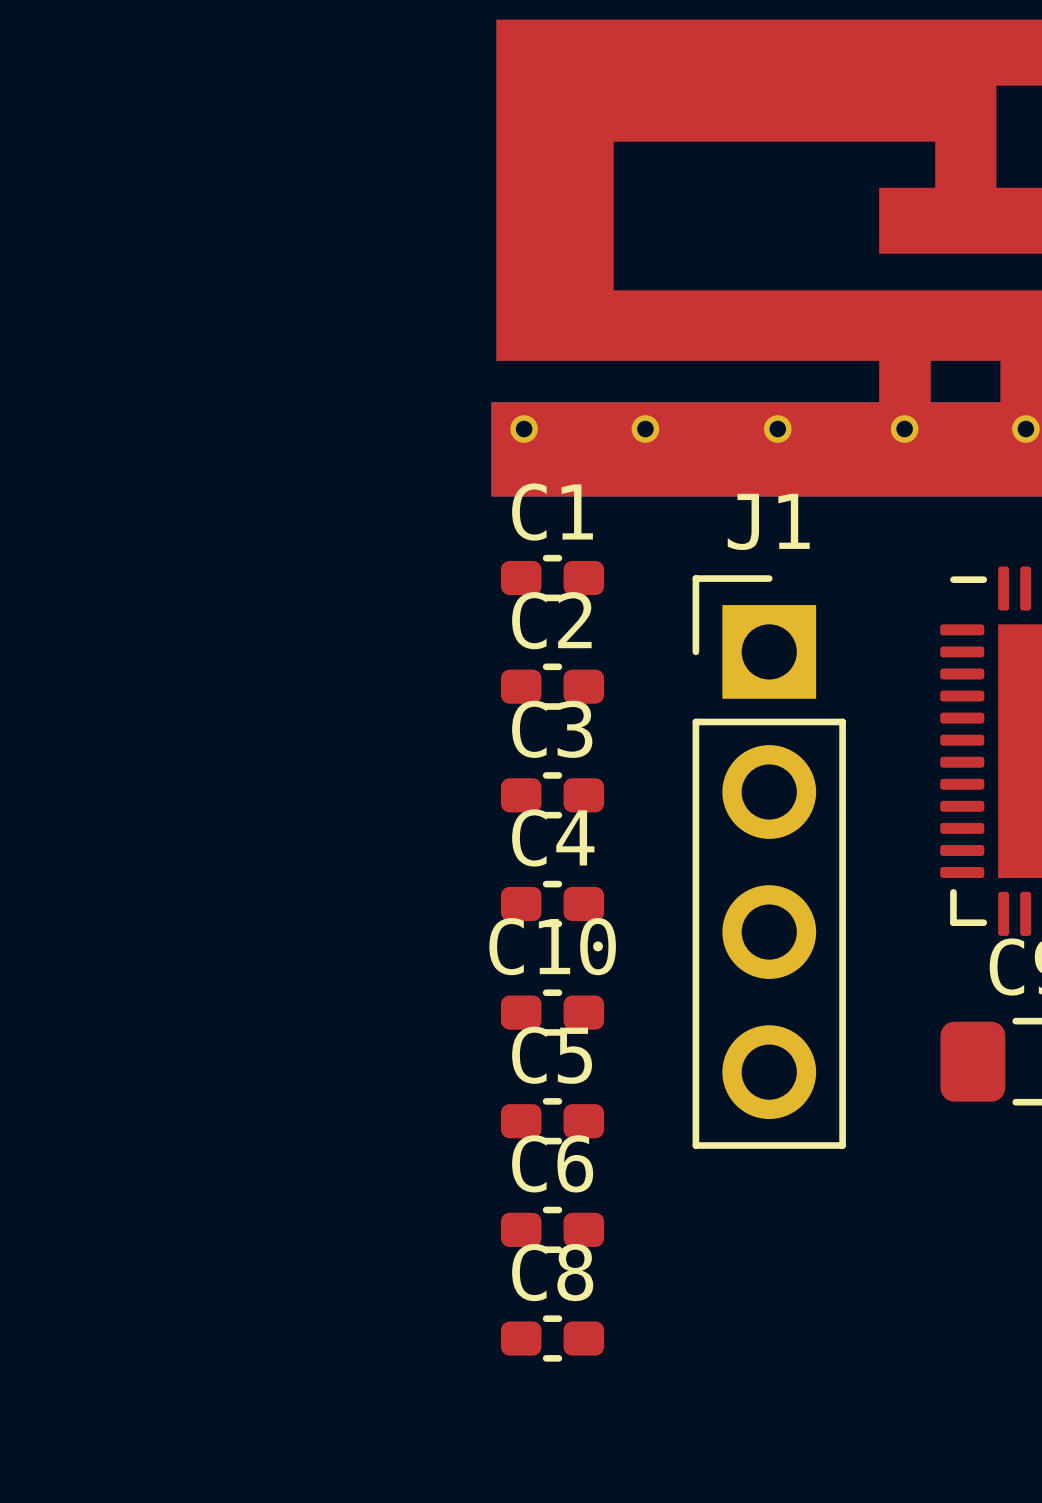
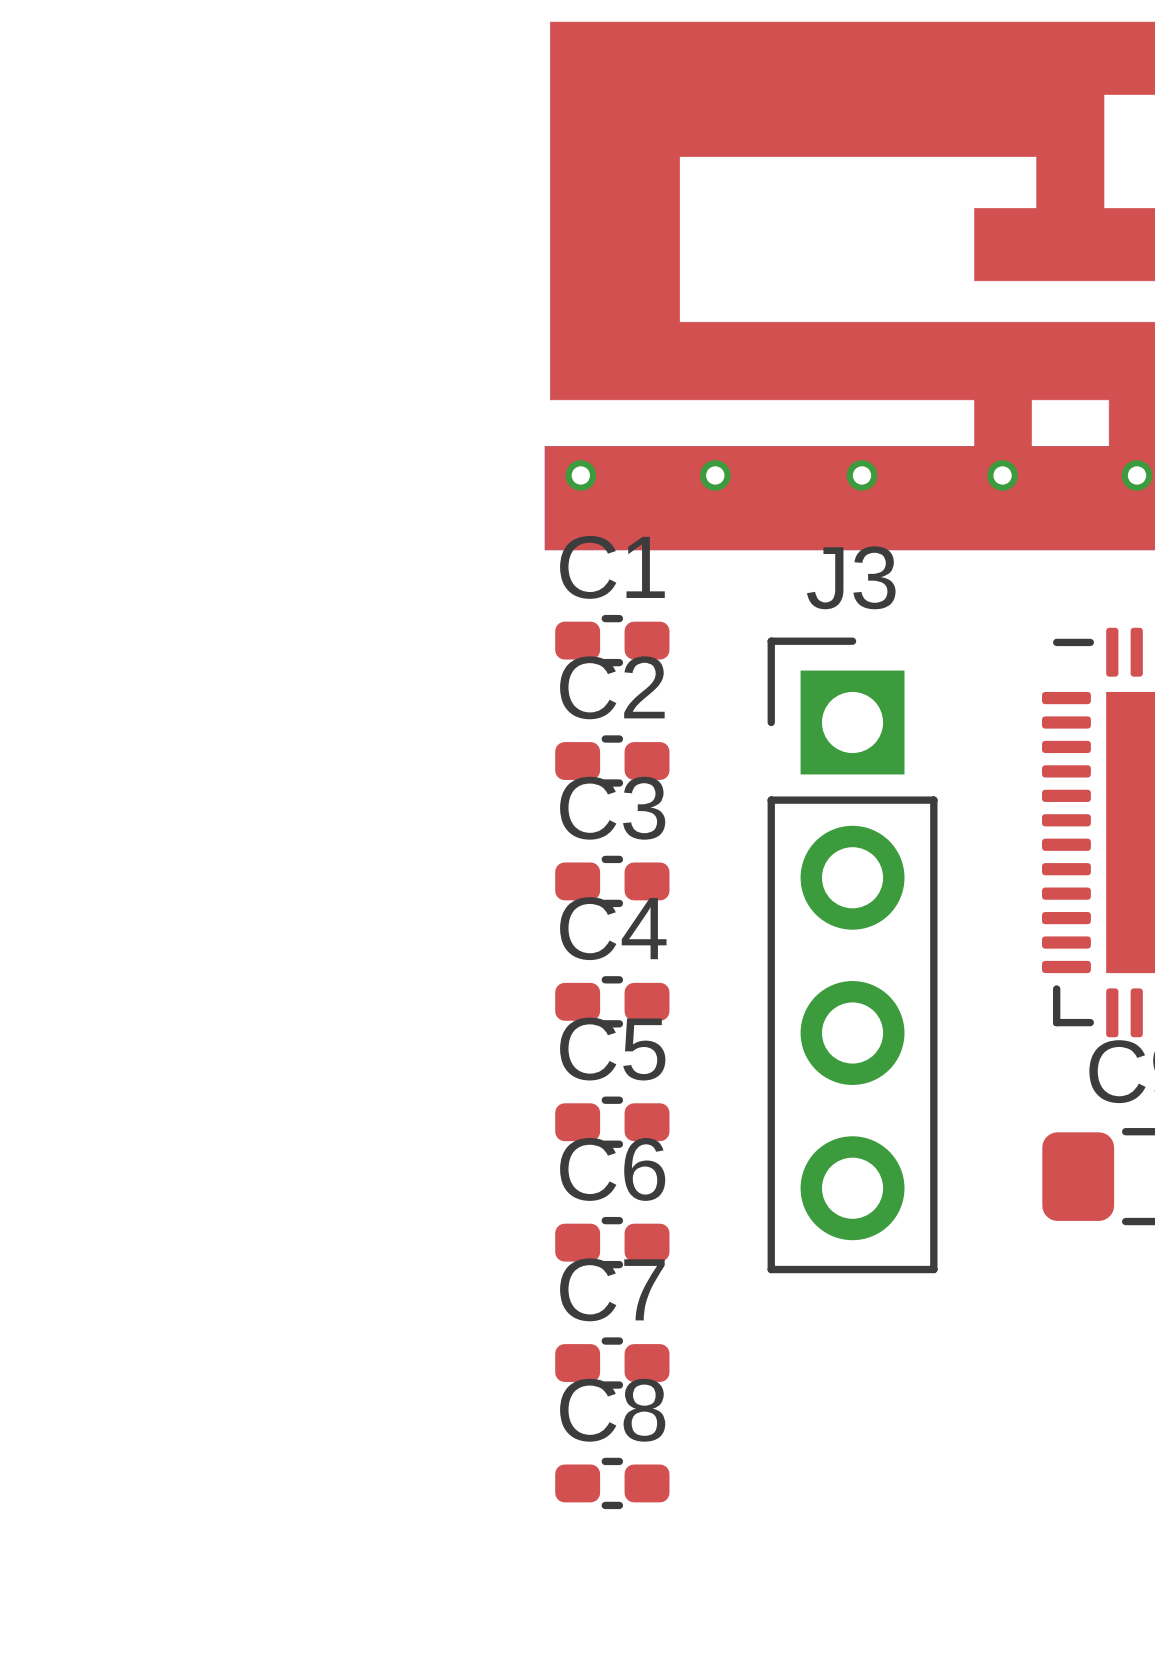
J1 name: J1 (768, 521) -> J3 (851, 577)
C10 name: C10 (552, 946) -> C5 (612, 1049)
C5 name: C5 (552, 1055) -> C6 (612, 1169)
C6 name: C6 (552, 1163) -> C7 (612, 1289)

